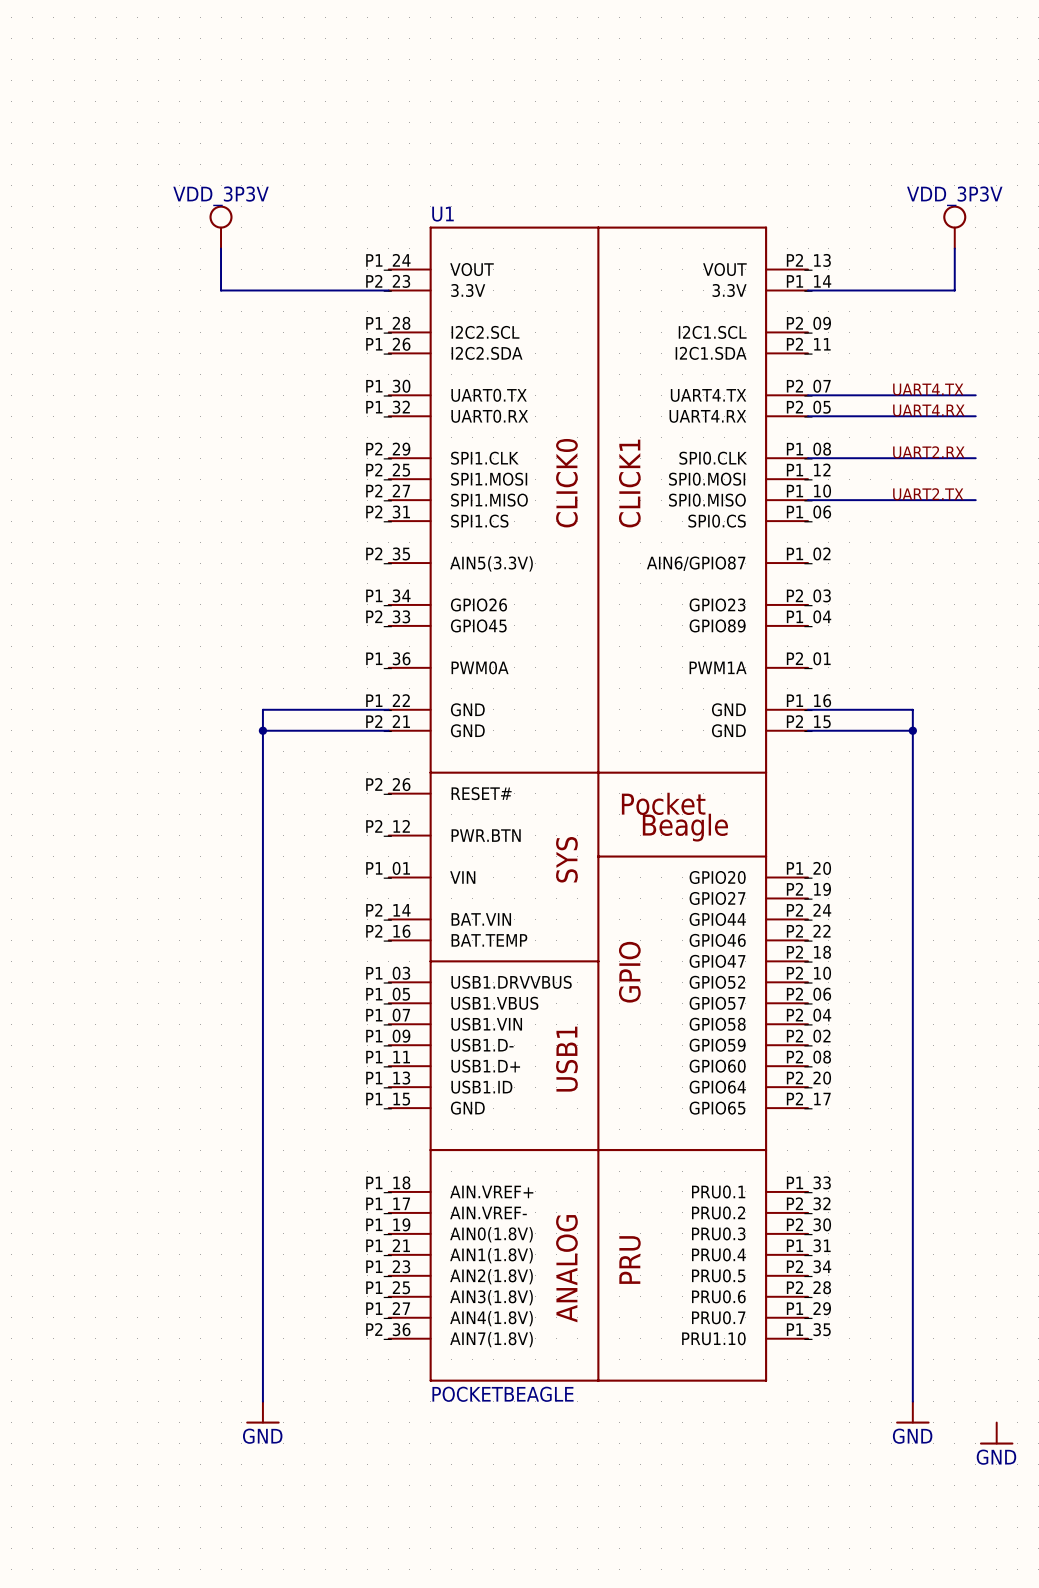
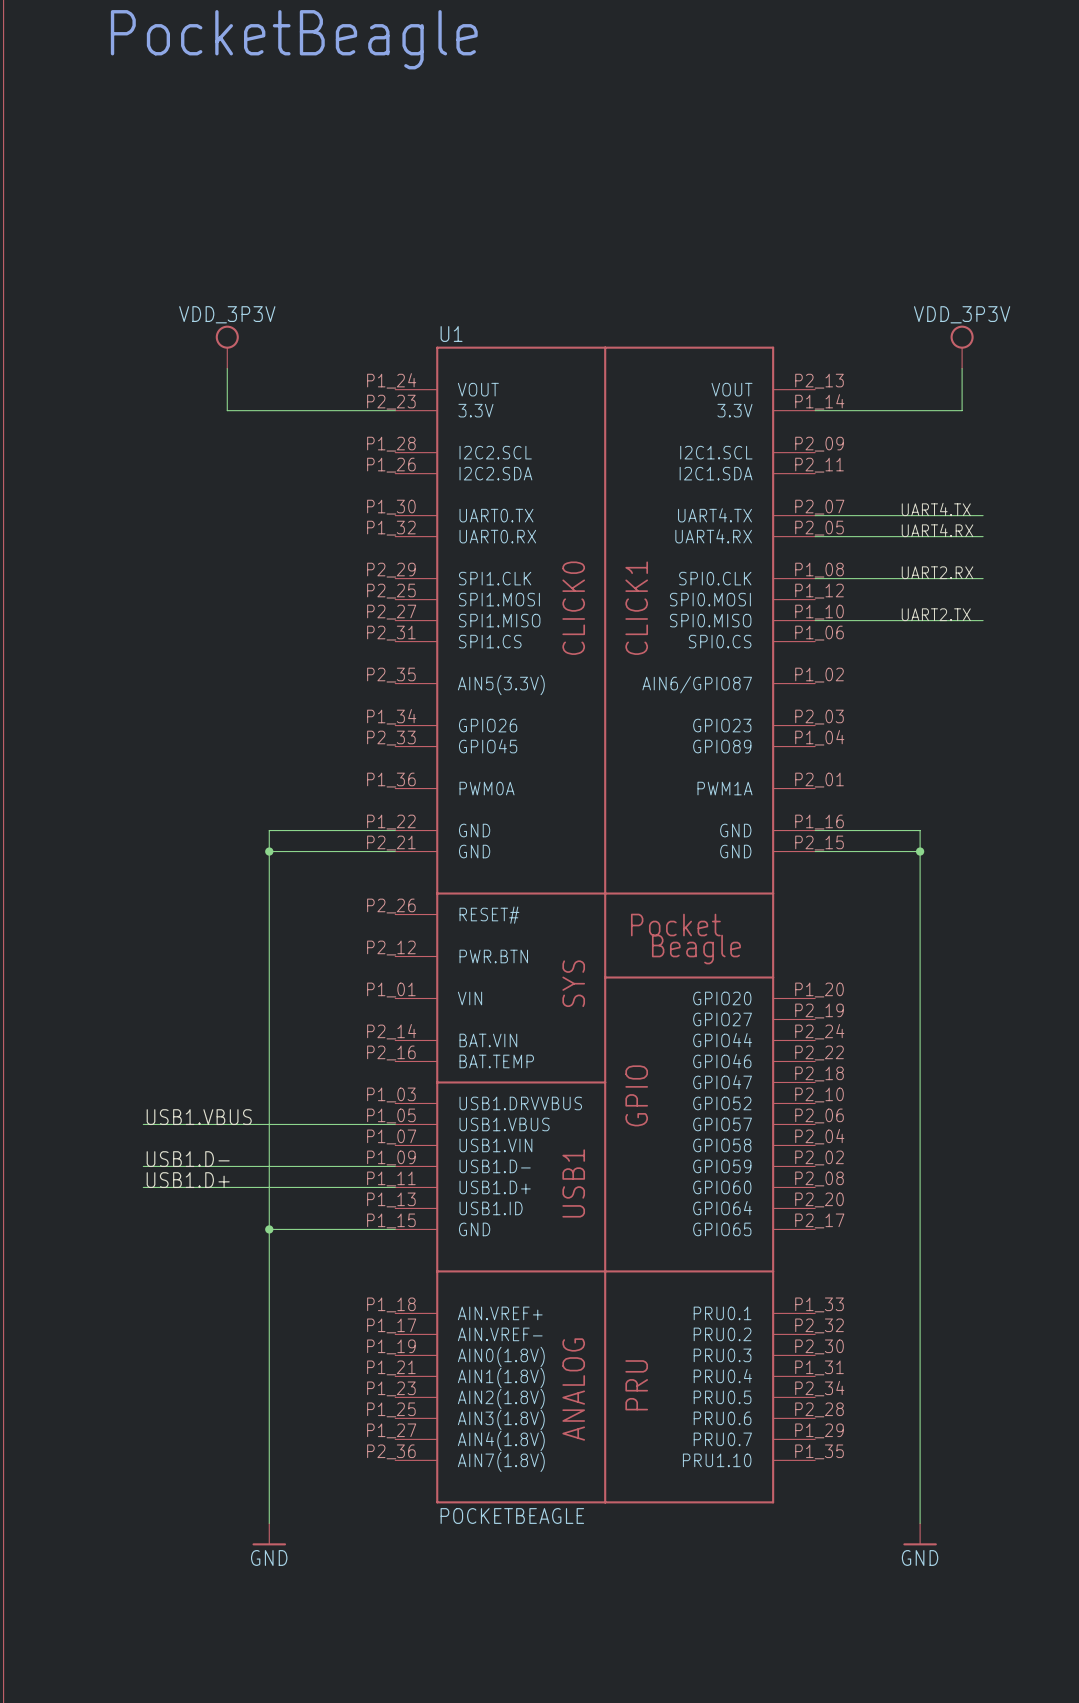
label: none -> USB1.VBUS (199, 1117)
wire: none -> (143, 1124) (395, 1124)
label: none -> USB1.D- (188, 1159)
wire: none -> (143, 1166) (395, 1166)
label: none -> USB1.D+ (188, 1180)
wire: none -> (143, 1187) (395, 1187)
wire: none -> (269, 1229) (395, 1229)
junction: none -> (269, 1229)
power symbol: GND (996, 1433) -> none

